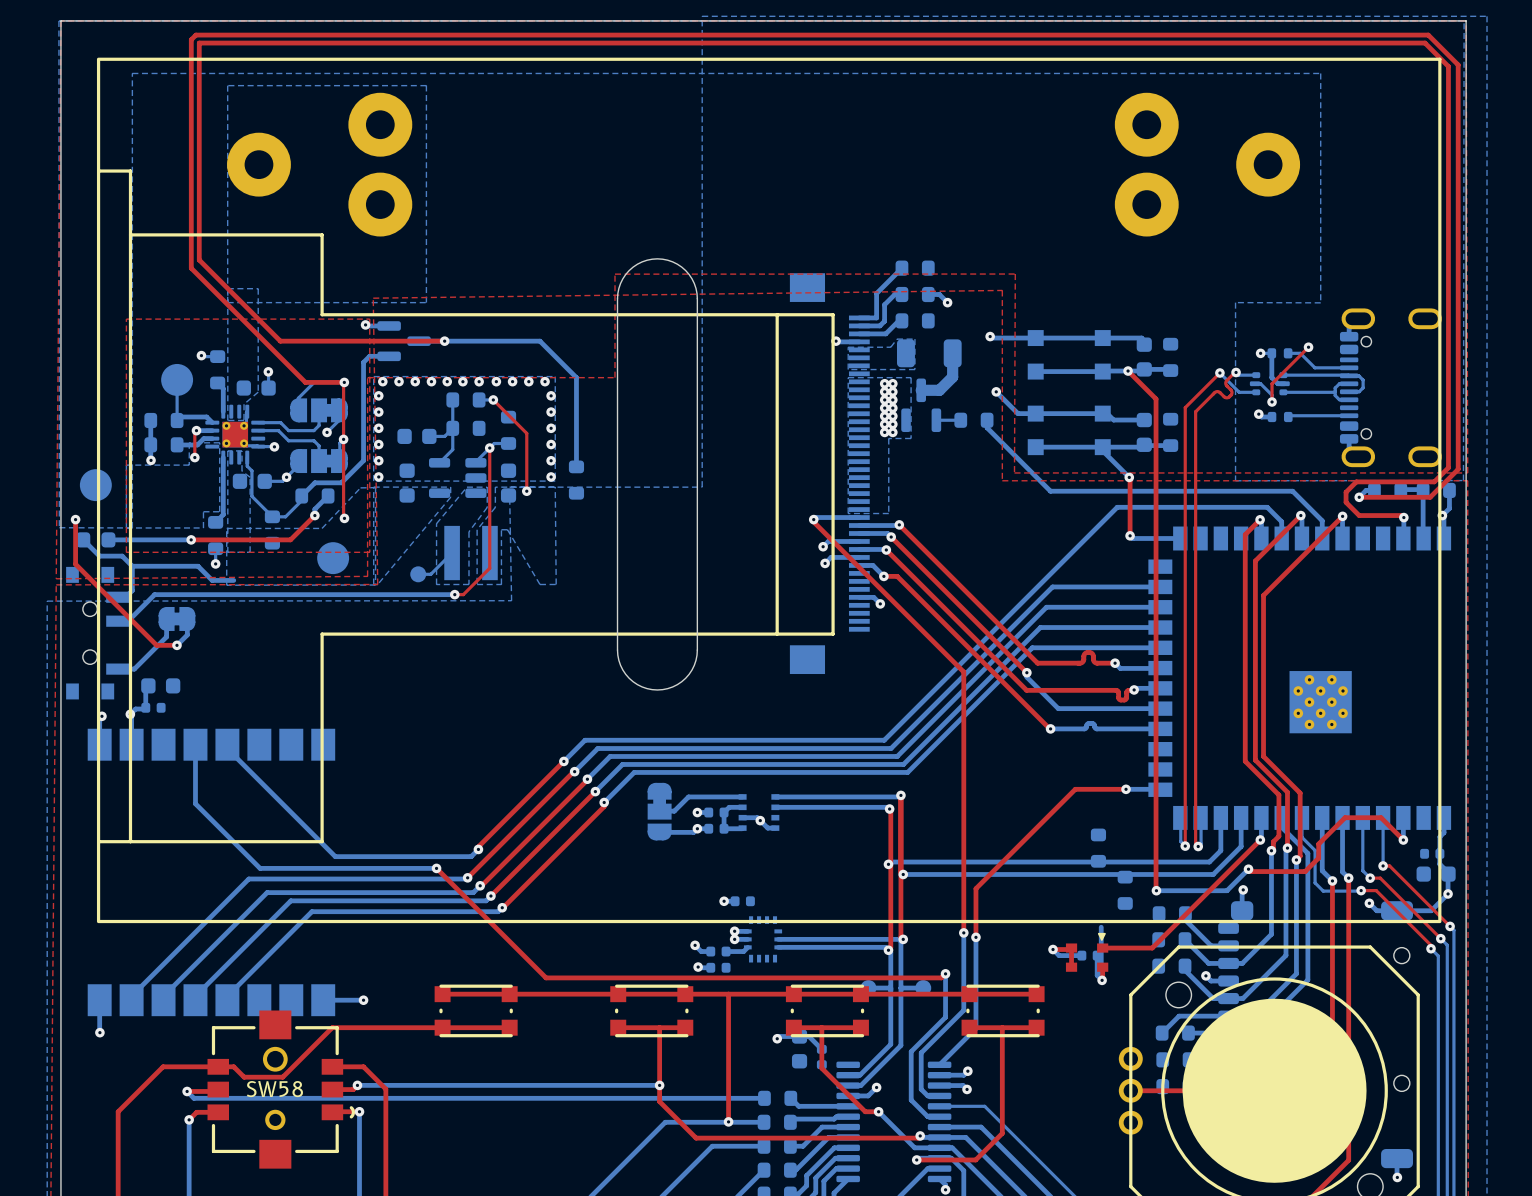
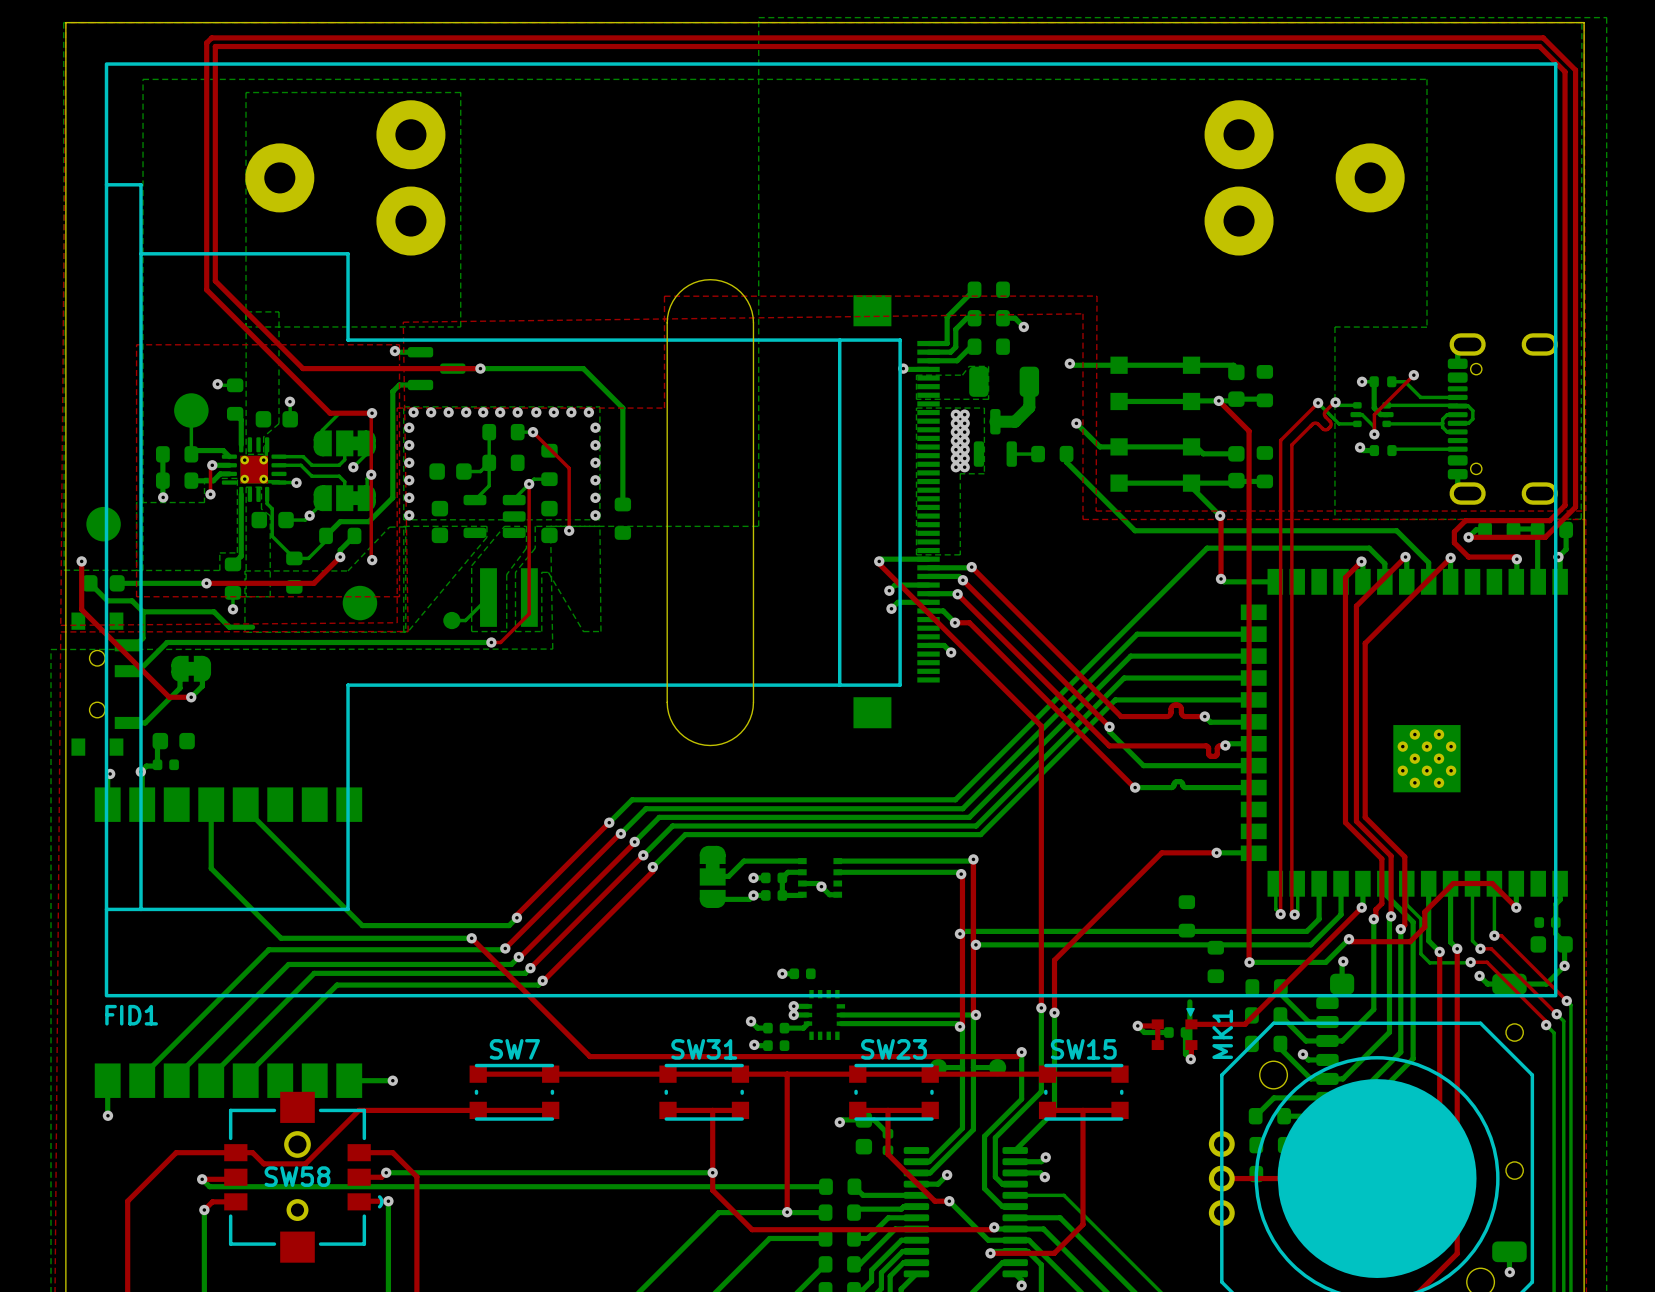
FID1: none -> (831, 529)
MK1 name: none -> MK1 (1222, 1034)
SW7 name: none -> SW7 (514, 1049)
SW31 name: none -> SW31 (704, 1049)
SW23 name: none -> SW23 (894, 1049)
SW15 name: none -> SW15 (1083, 1049)

